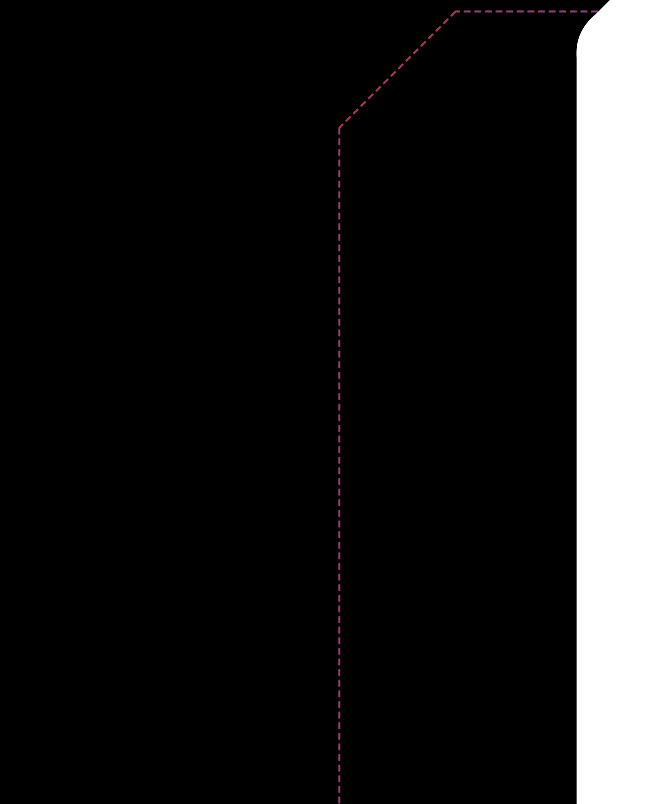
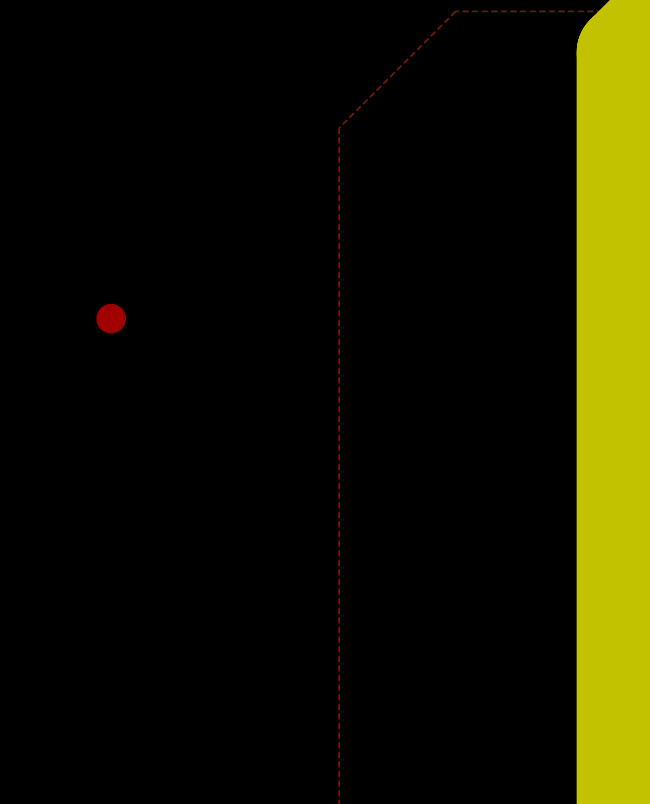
part: none -> (111, 318)

